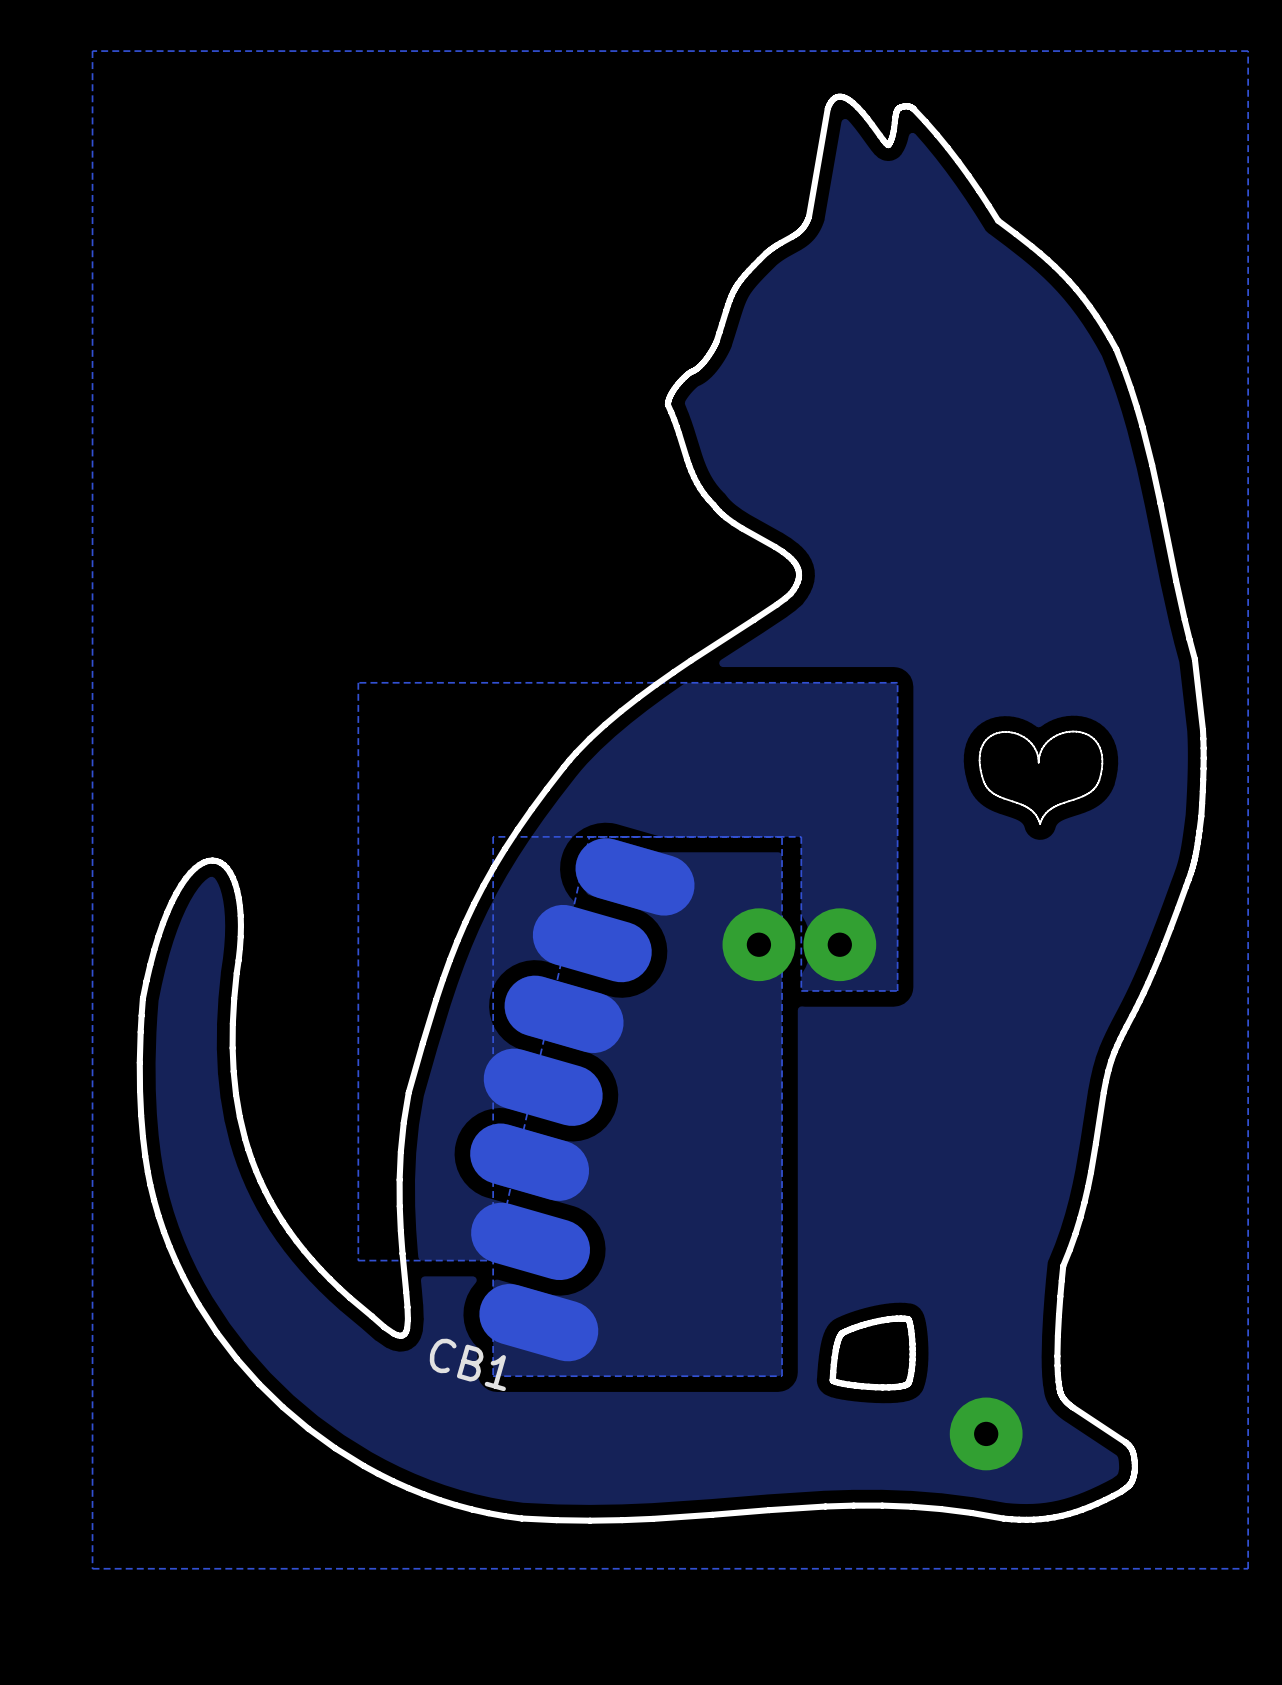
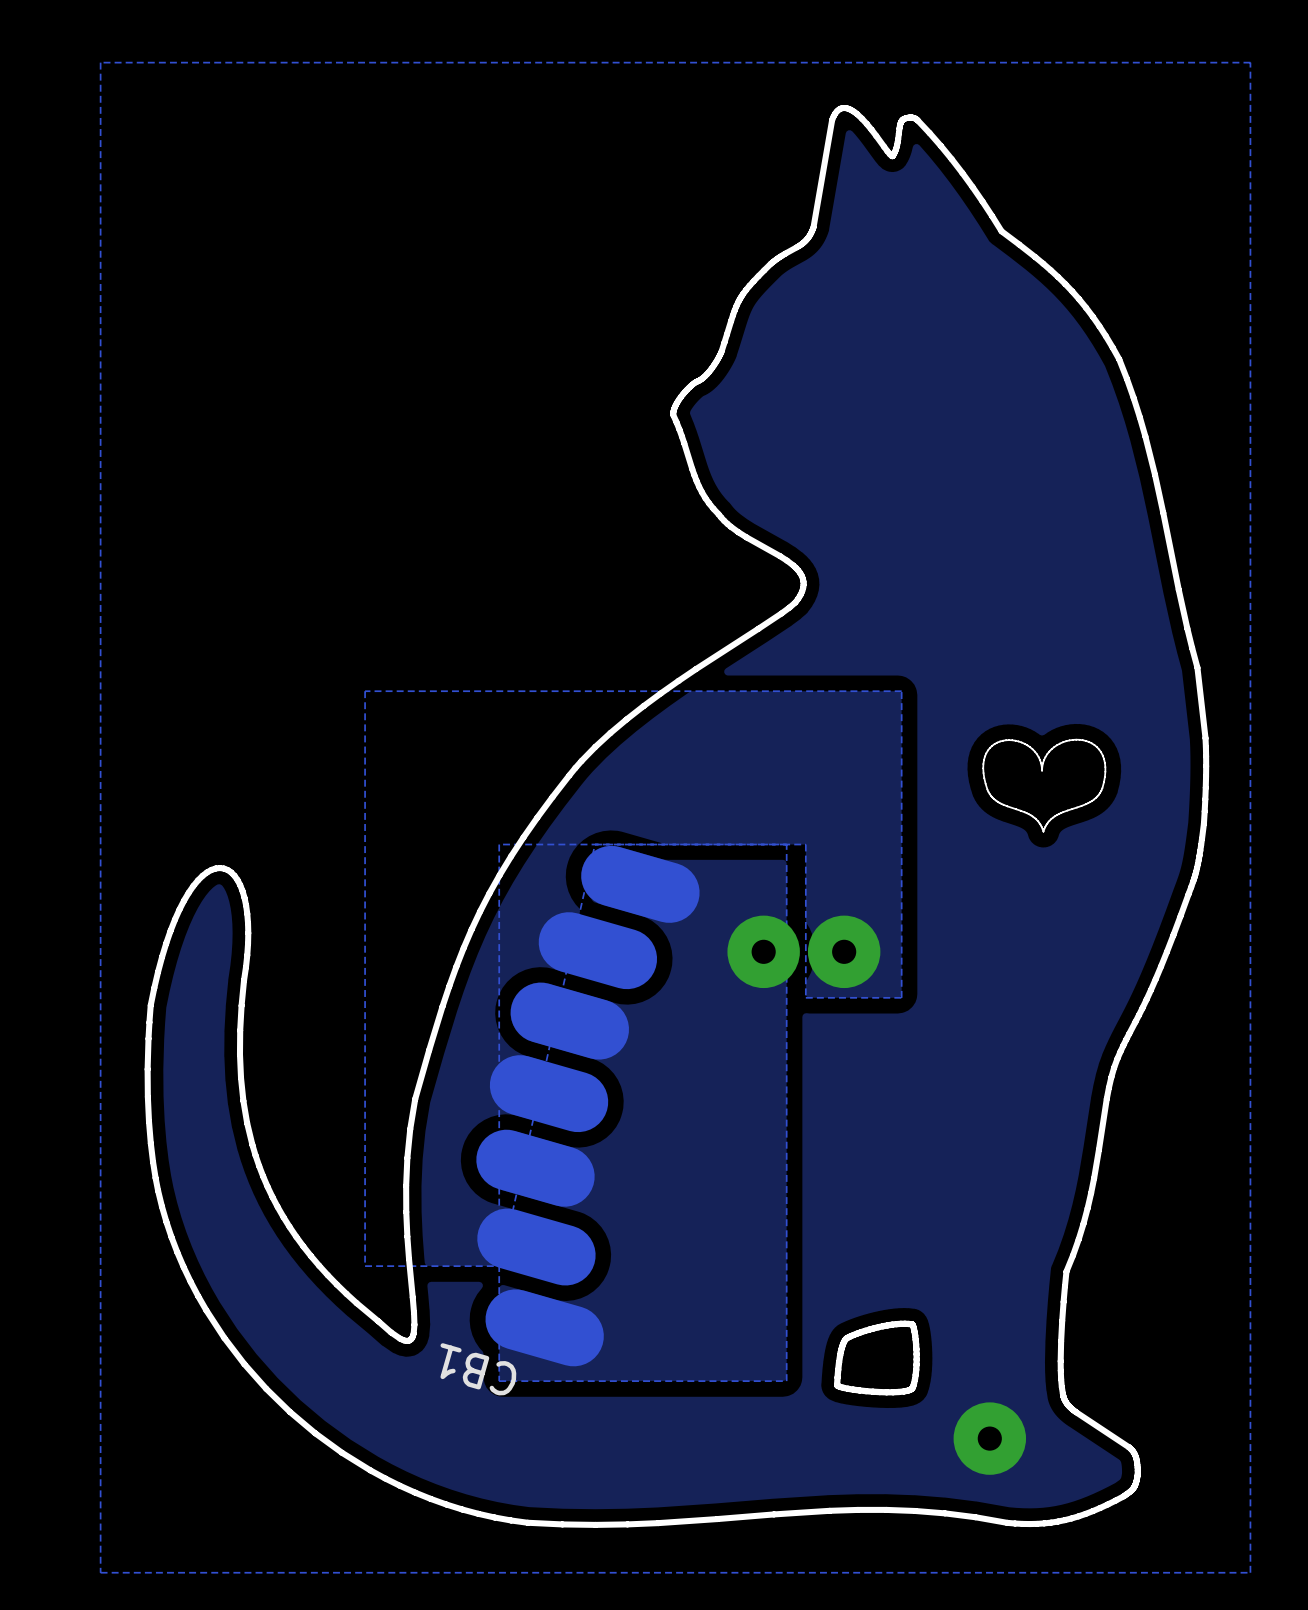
CB1 name rotation: 0° (467, 1364) -> 180° (478, 1369)

